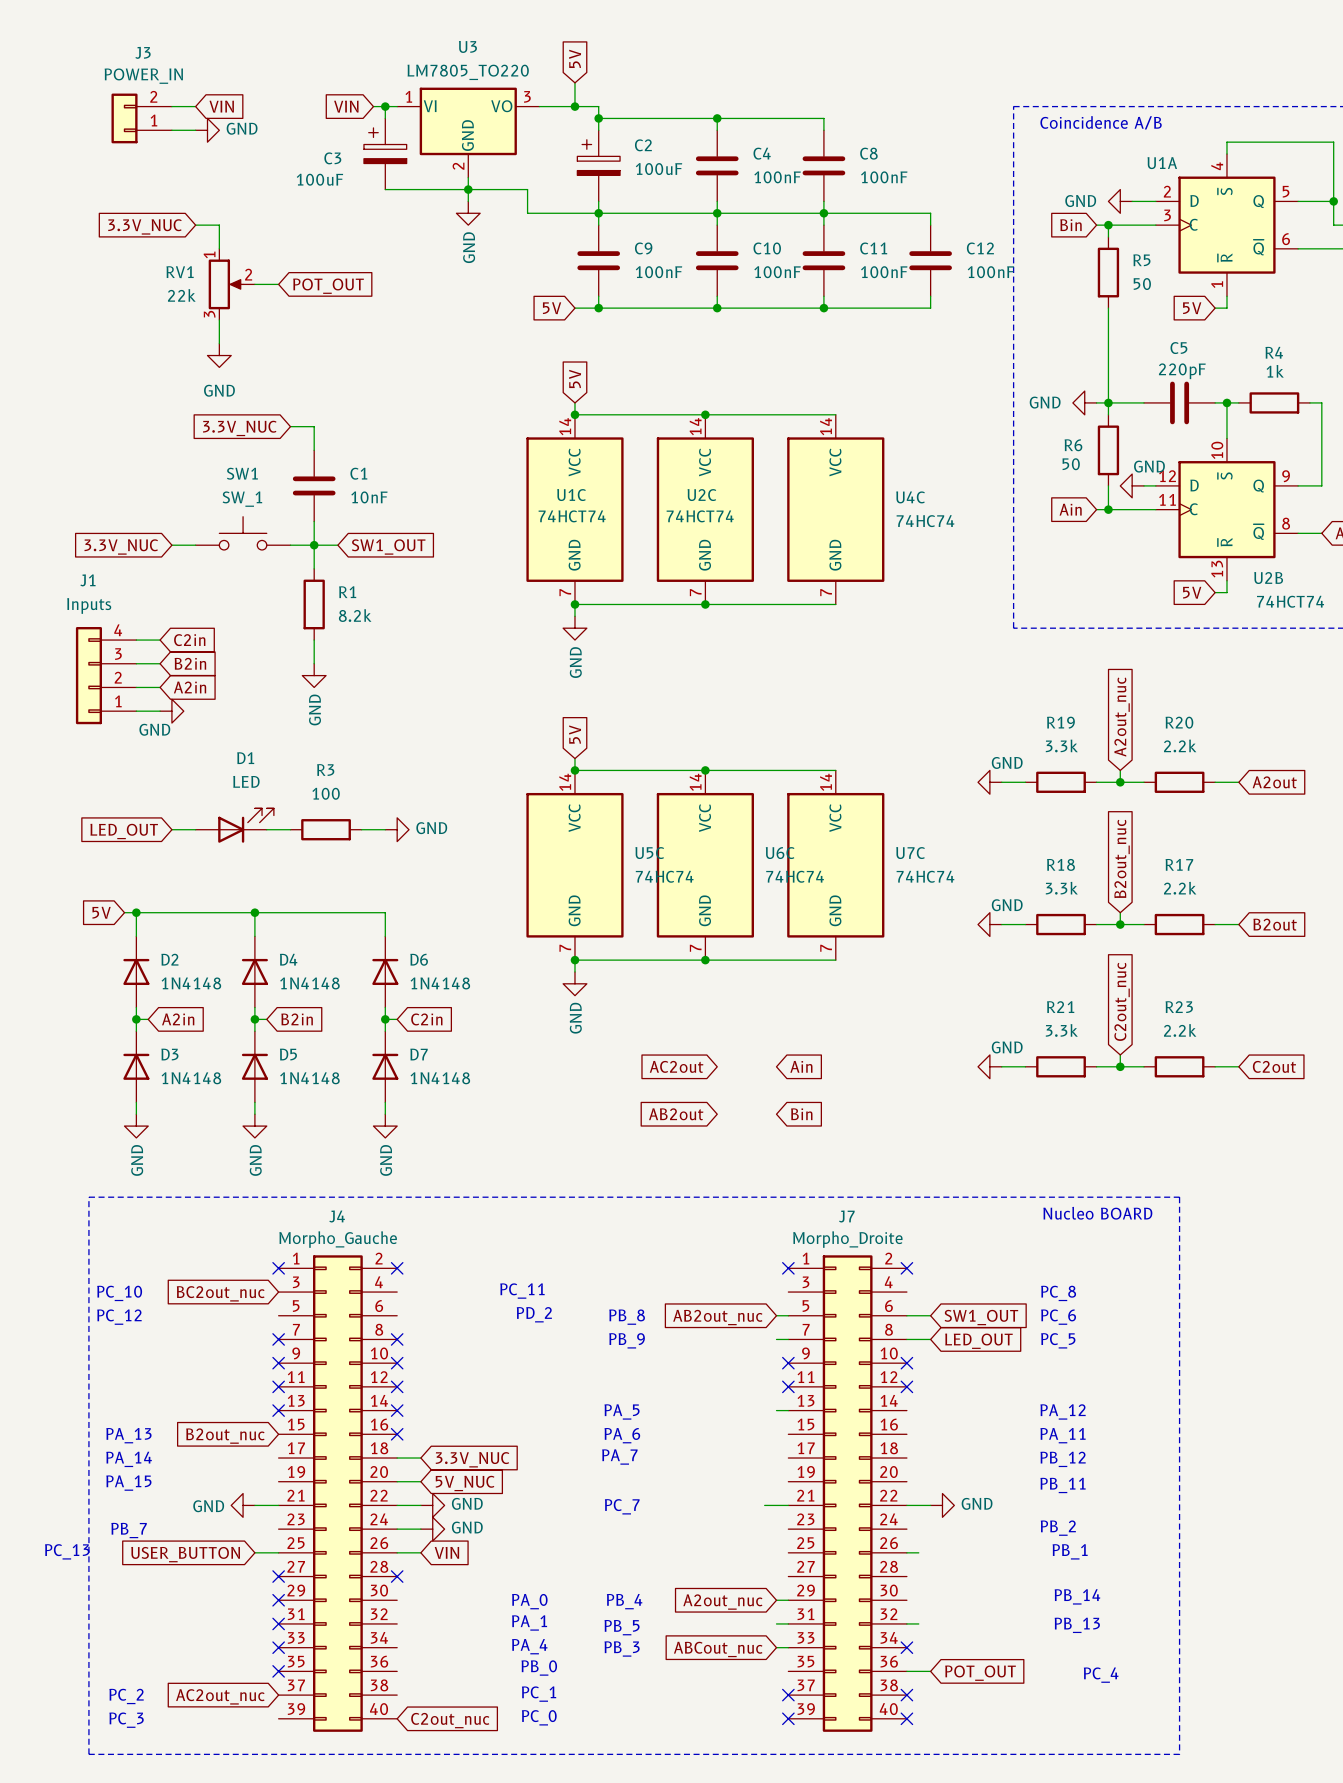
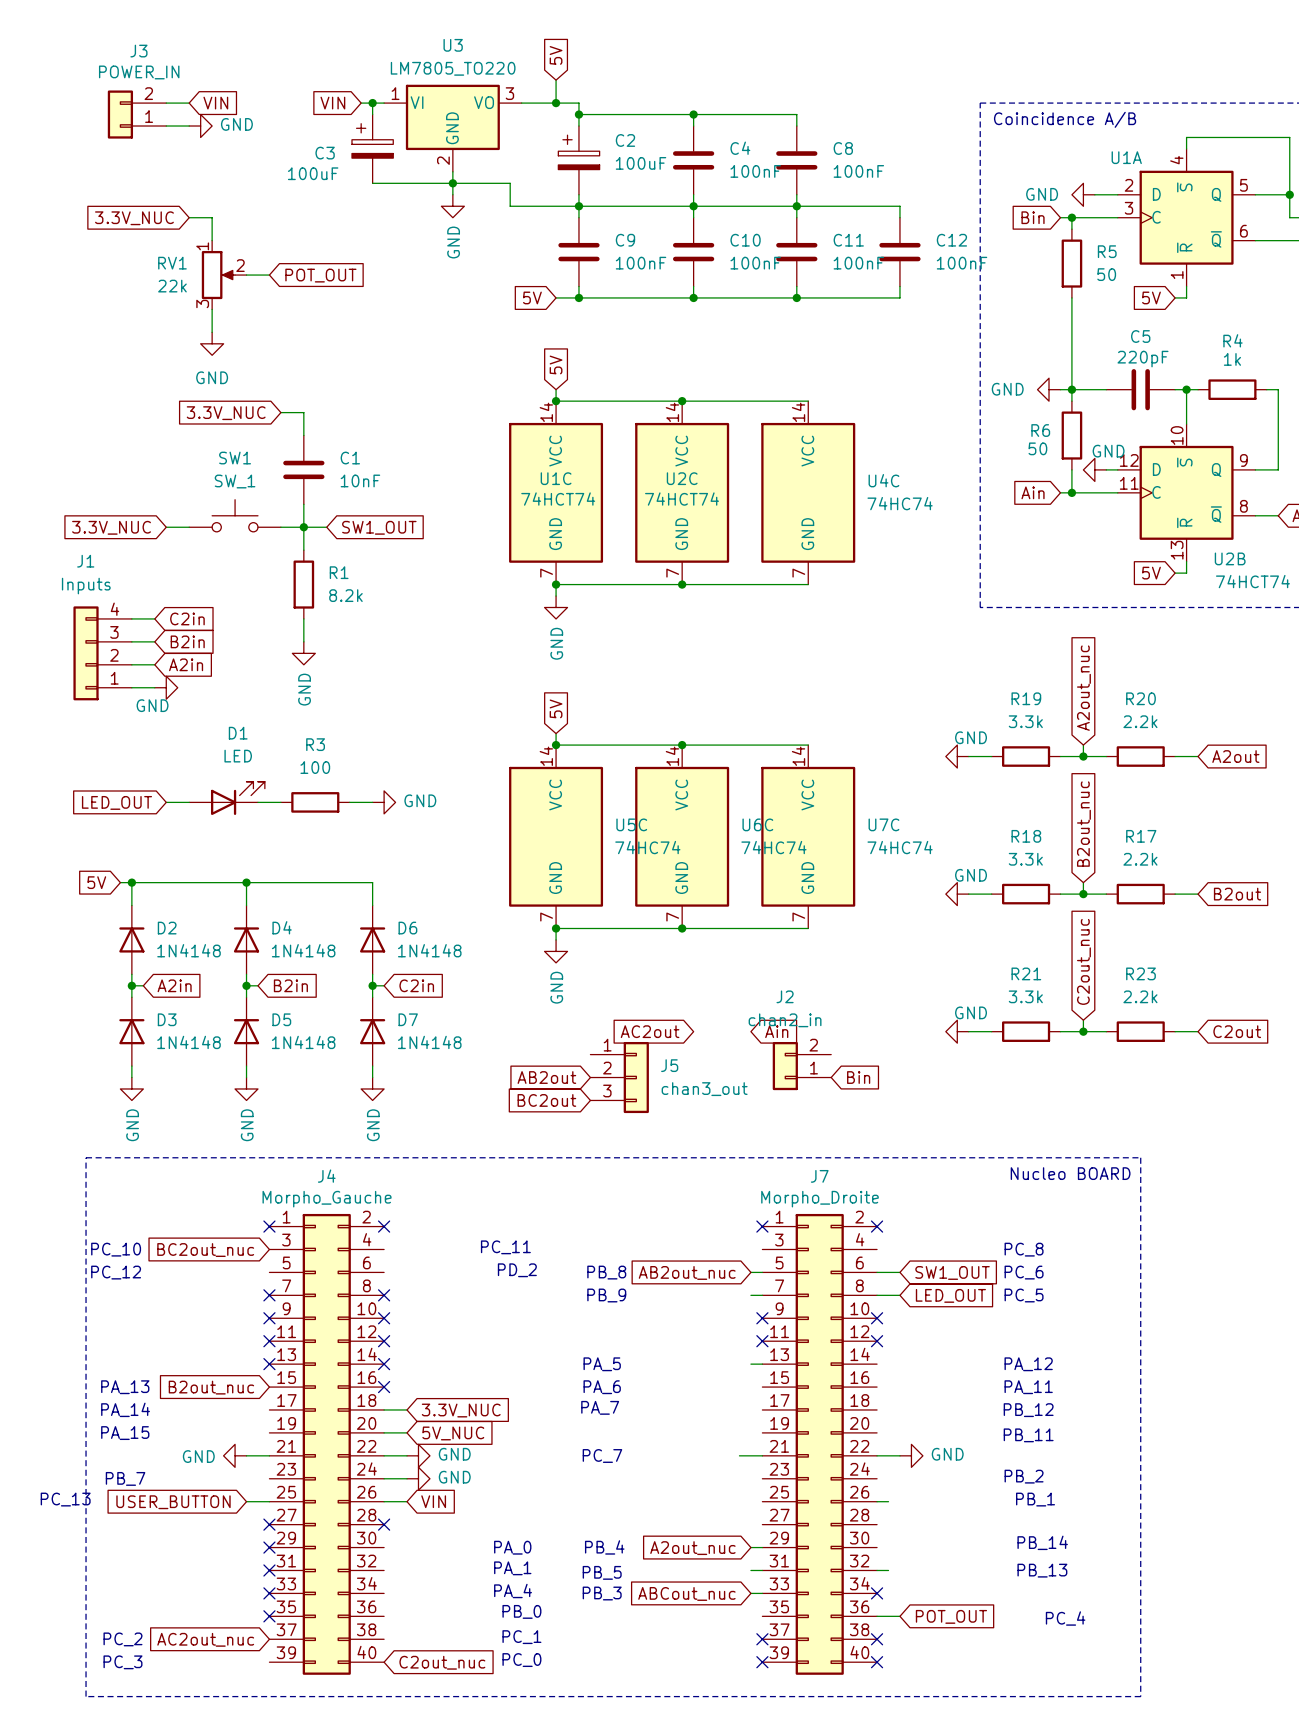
J2: none -> chan2_in (801, 1066)
J5: none -> chan3_out (619, 1077)
global label position: AB2out (676, 1114) -> AB2out (546, 1077)
global label position: Bin (801, 1114) -> Bin (858, 1077)
global label: none -> BC2out (546, 1100)

